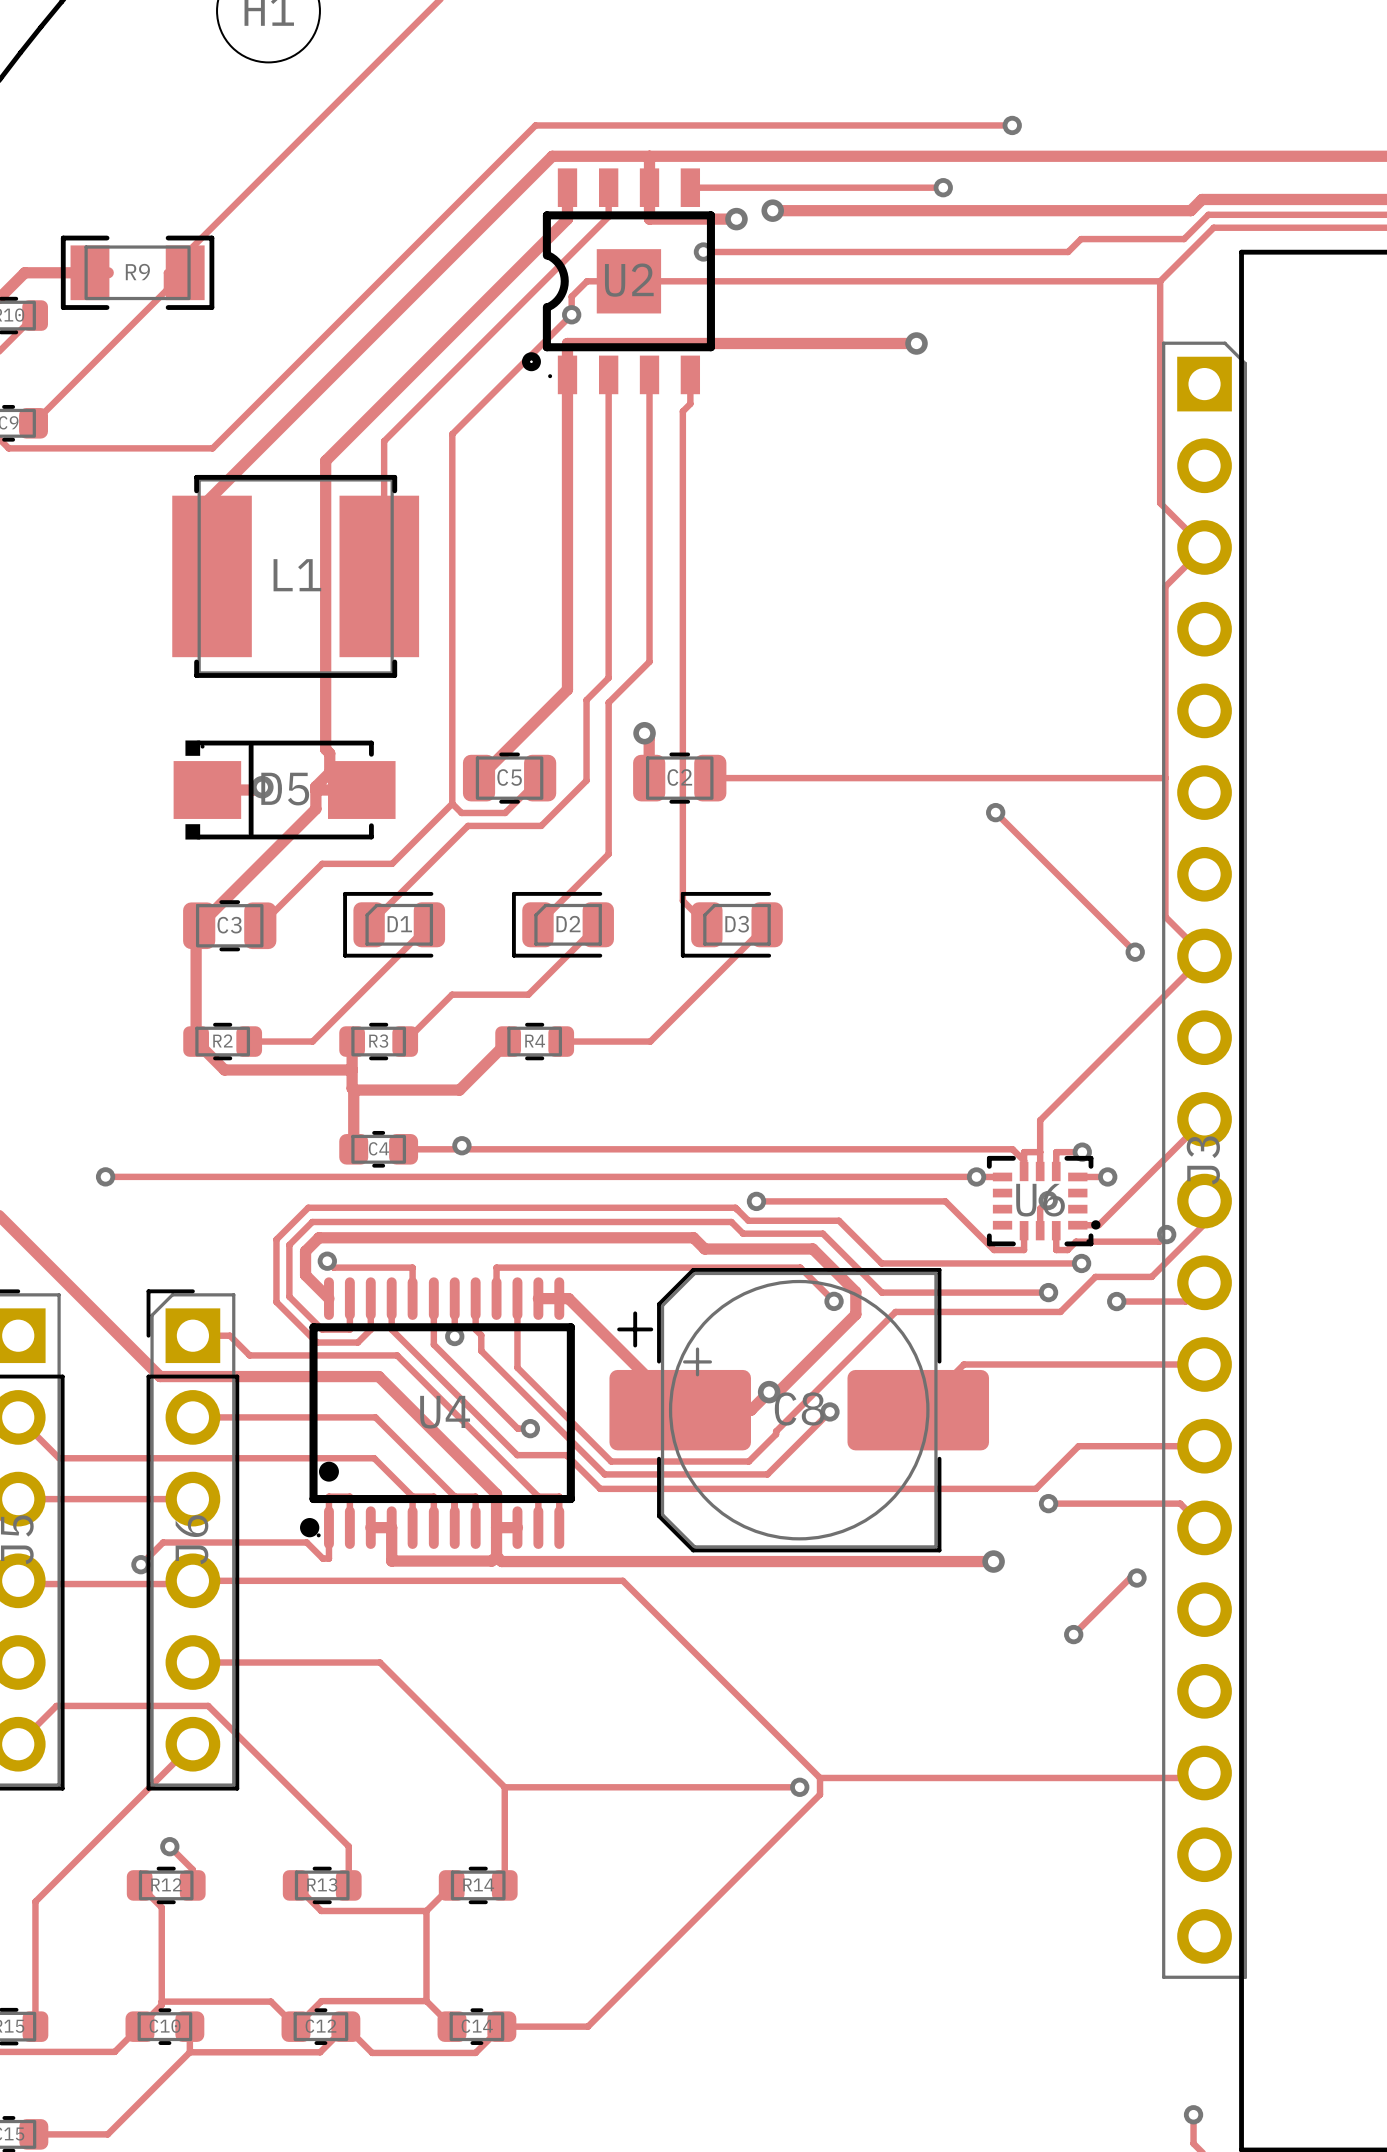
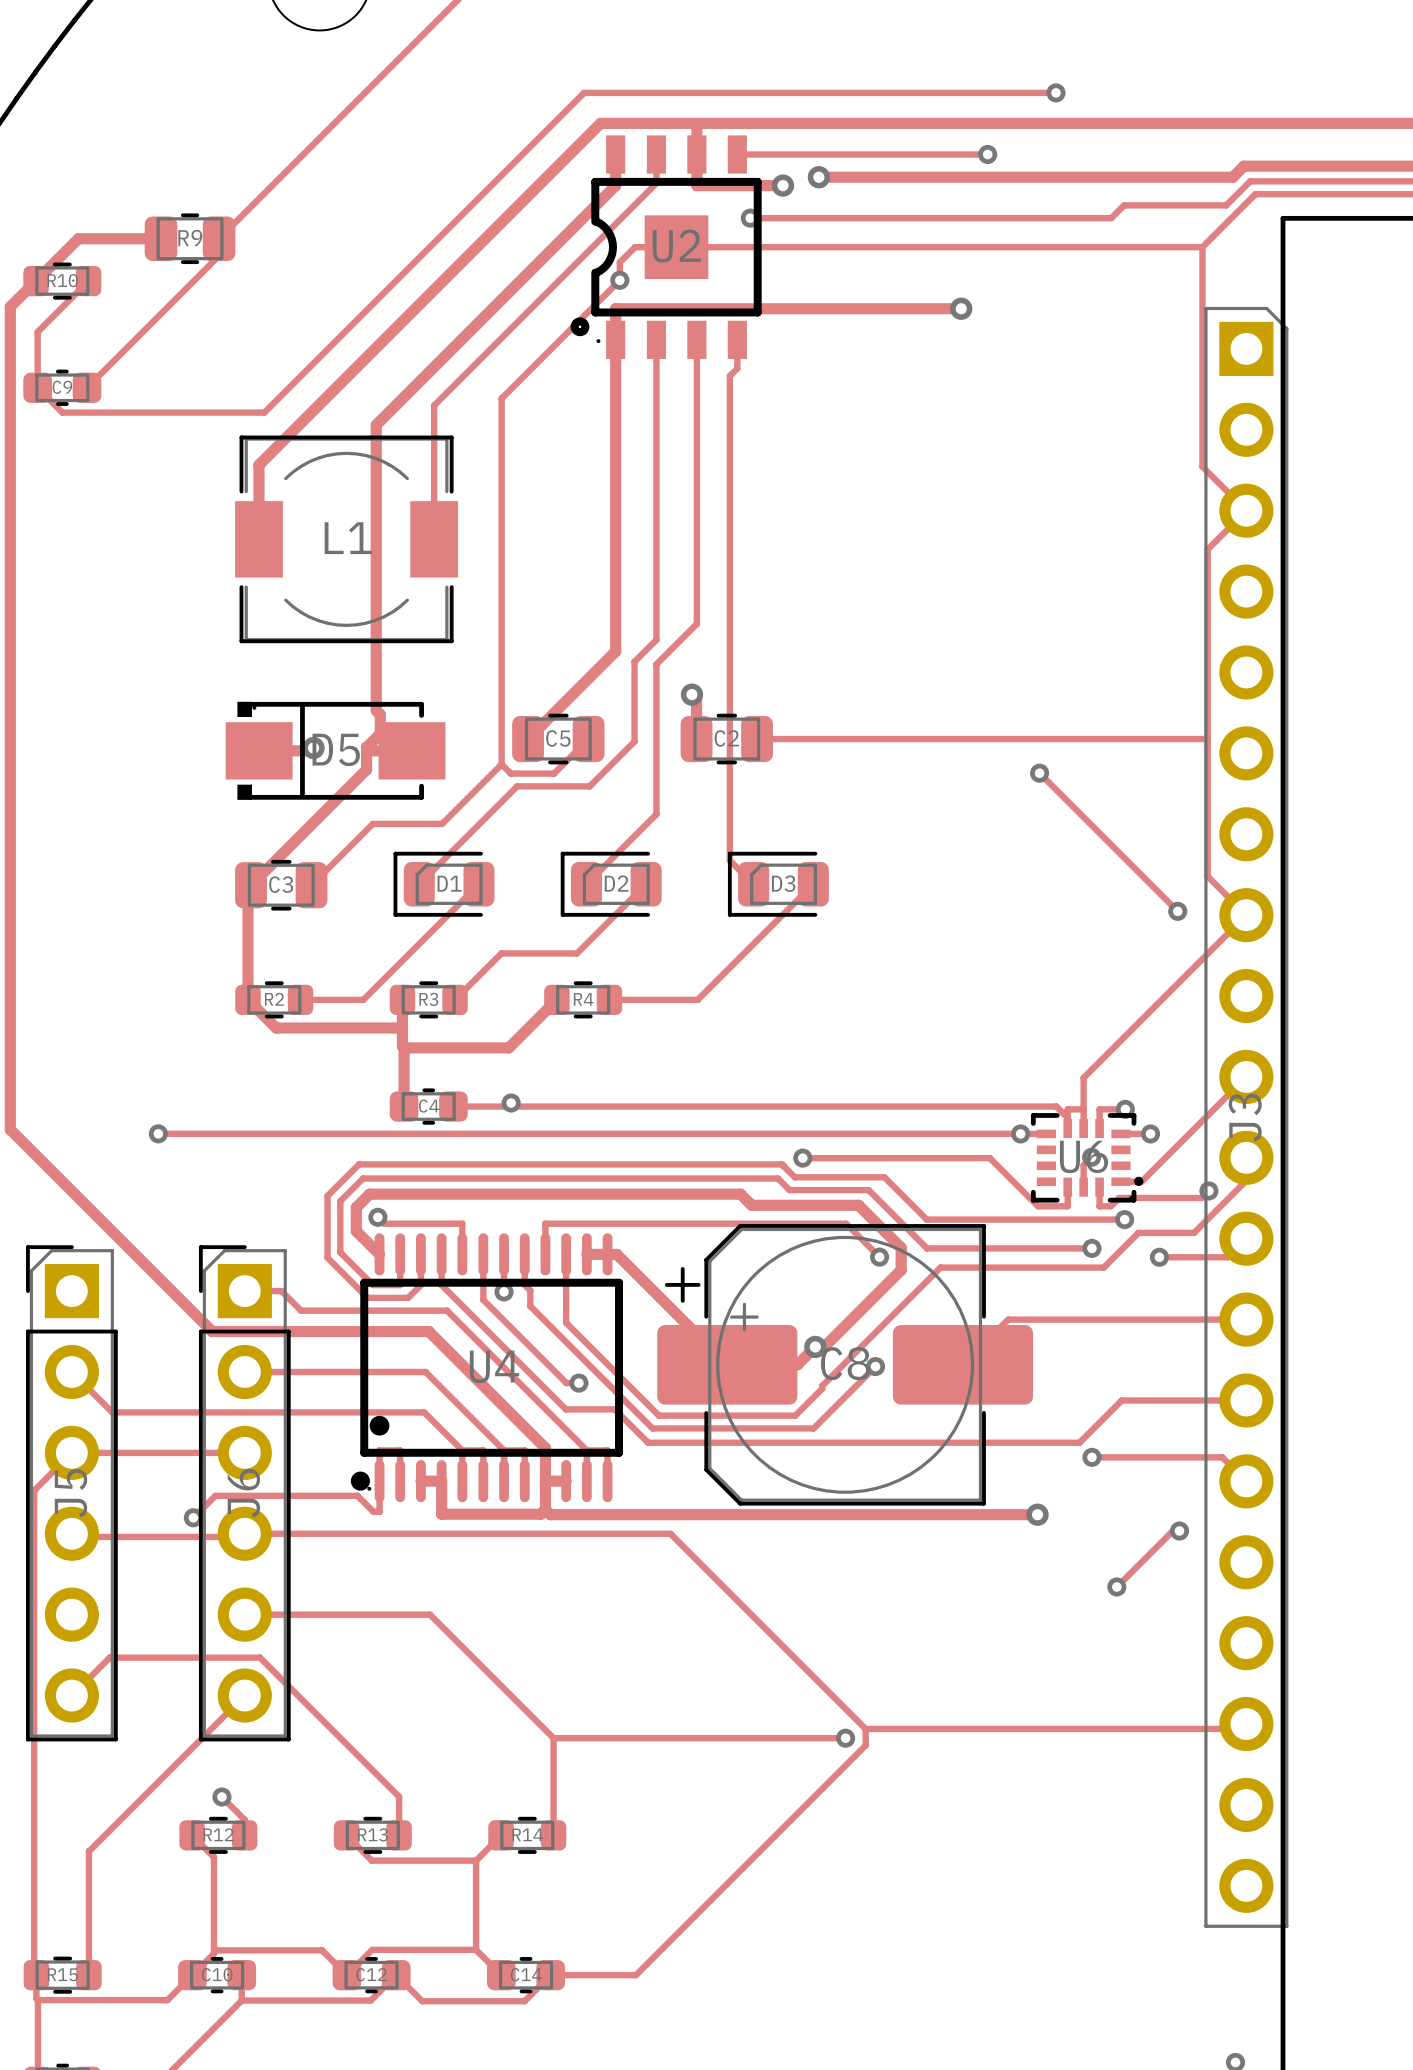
R9 footprint: [60, 235, 215, 310] -> [144, 213, 236, 265]
L1 footprint: [172, 474, 420, 678] -> [235, 435, 459, 644]

